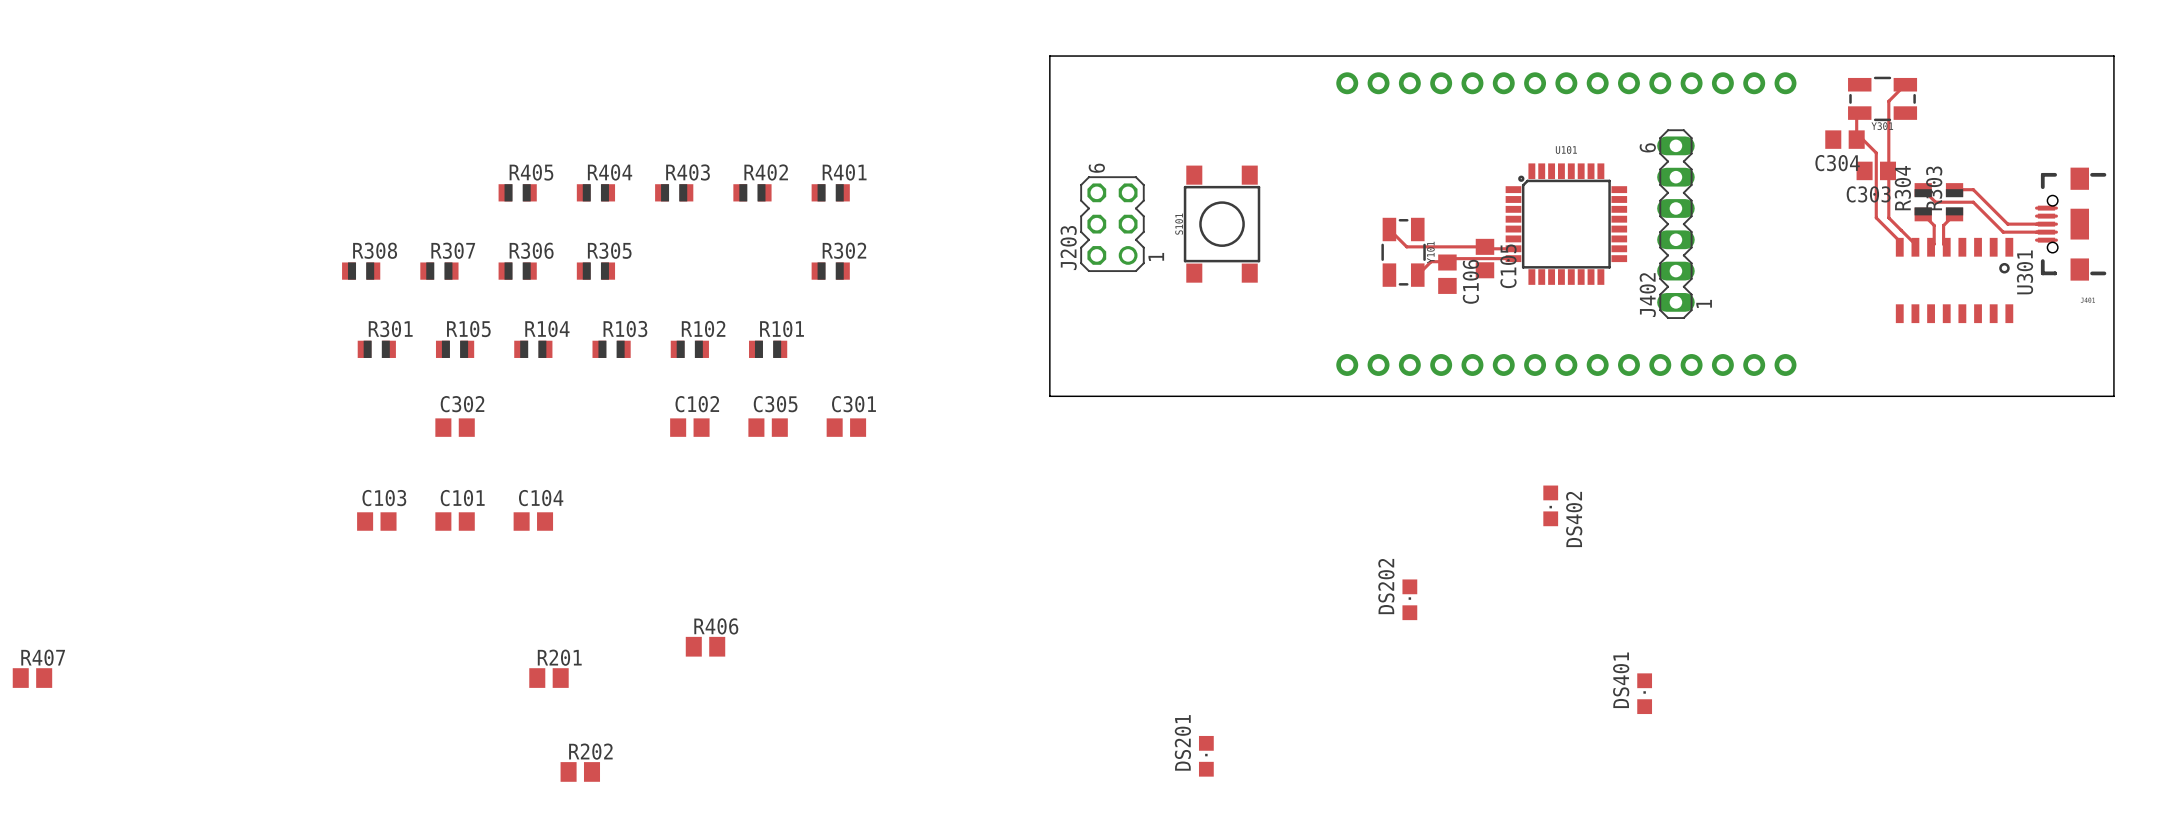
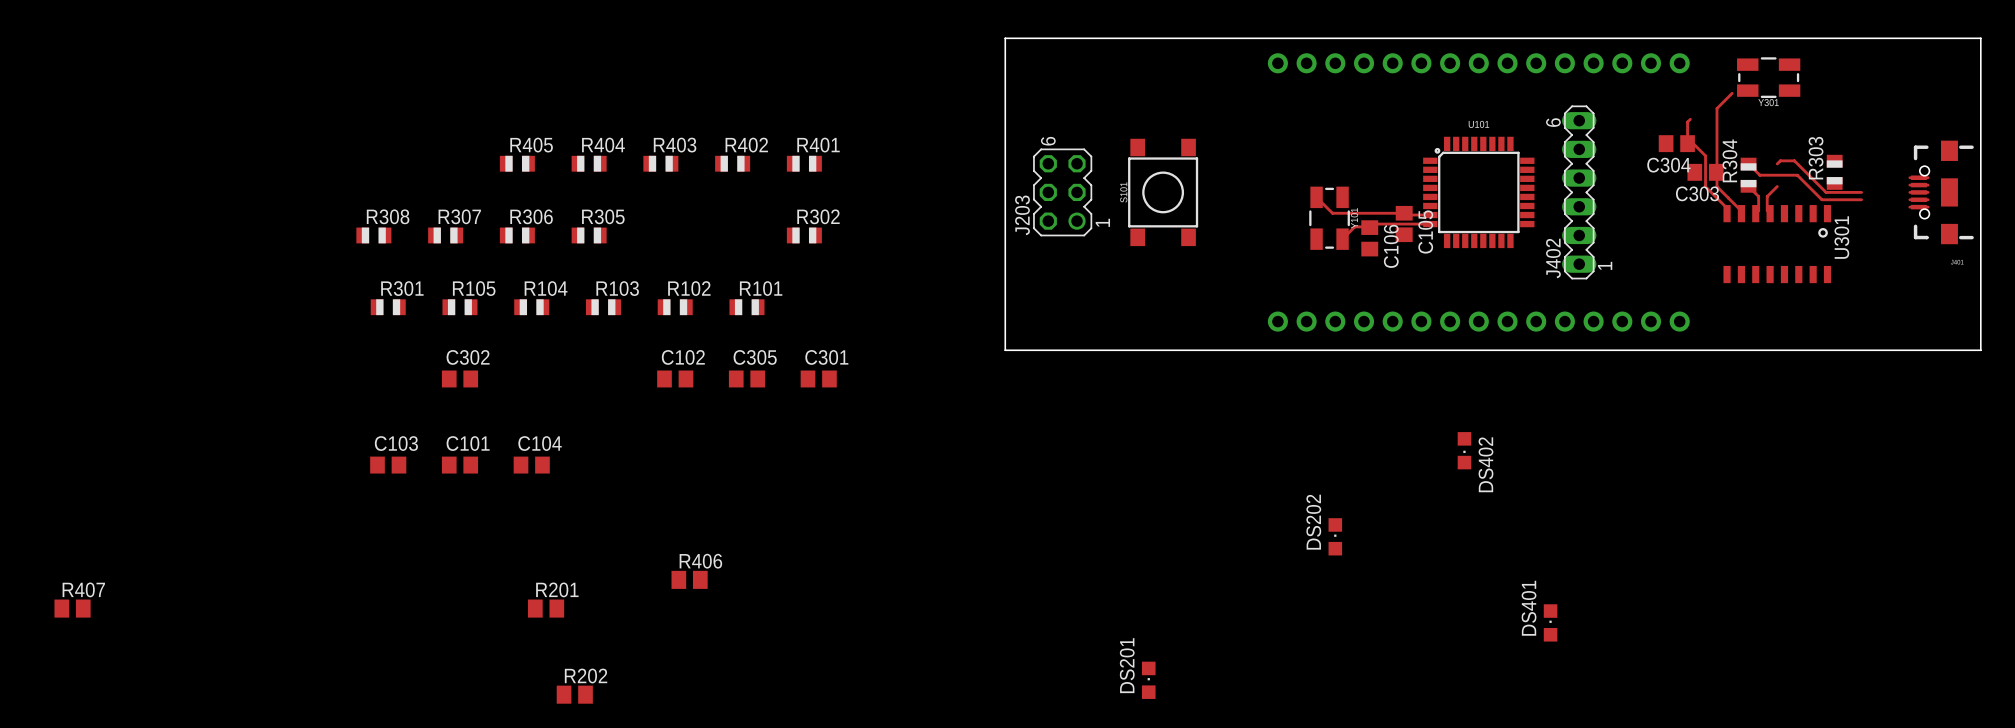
track: (1905, 84) (1888, 101) (1888, 217) (1915, 244) (1915, 247) -> none
track: (1859, 113) (1856, 116) (1856, 139) (1862, 139) (1876, 152) (1876, 217) (1899, 241) (1899, 247) -> none
track: none -> (1732, 93) (1717, 108) (1717, 186) (1741, 211) (1741, 213)
C304 position: (1844, 139) -> (1676, 143)
track: none -> (1690, 119) (1687, 122) (1687, 143) (1693, 143) (1705, 155) (1705, 186) (1727, 208) (1727, 213)
C303 position: (1876, 170) -> (1705, 172)
track: (1923, 189) (1935, 202) (1973, 202) (2003, 232) (2046, 232) -> none
track: (1954, 189) (1973, 189) (2007, 224) (2046, 224) -> none
track: none -> (1748, 163) (1759, 175) (1797, 175) (1821, 199) (1861, 199)
track: none -> (1777, 163) (1780, 160) (1794, 160) (1826, 192) (1861, 192)
R304 position: (1923, 202) -> (1748, 175)
track: (1923, 214) (1934, 225) (1934, 244) (1931, 247) -> none
track: (1954, 214) (1943, 225) (1943, 244) (1946, 247) -> none
track: none -> (1748, 186) (1758, 196) (1758, 210) (1755, 213)
track: none -> (1777, 186) (1767, 196) (1767, 210) (1770, 213)
U301 position: (1954, 280) -> (1777, 244)

